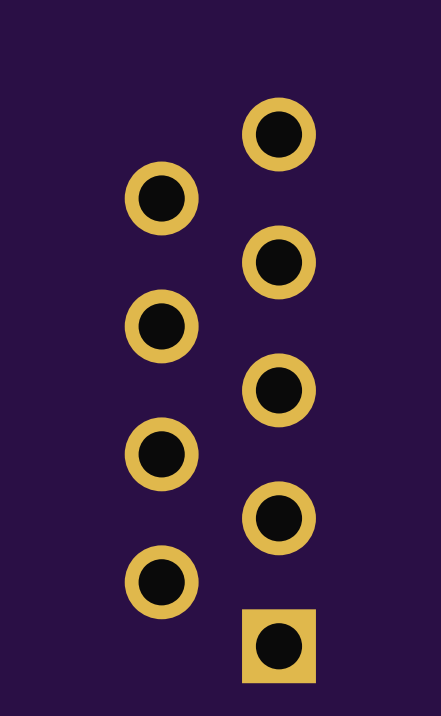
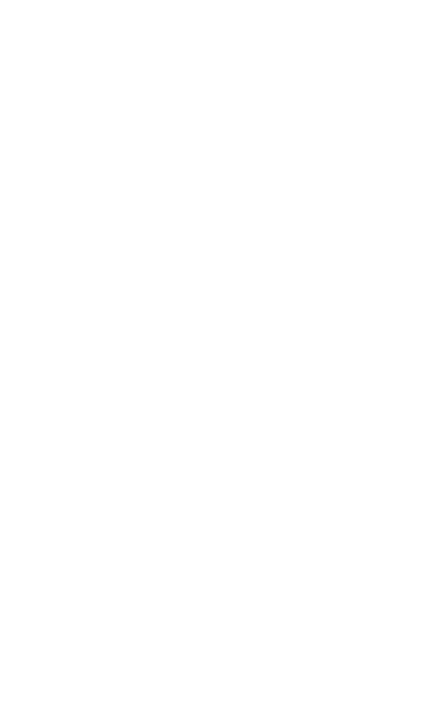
part: (220, 390) -> none

